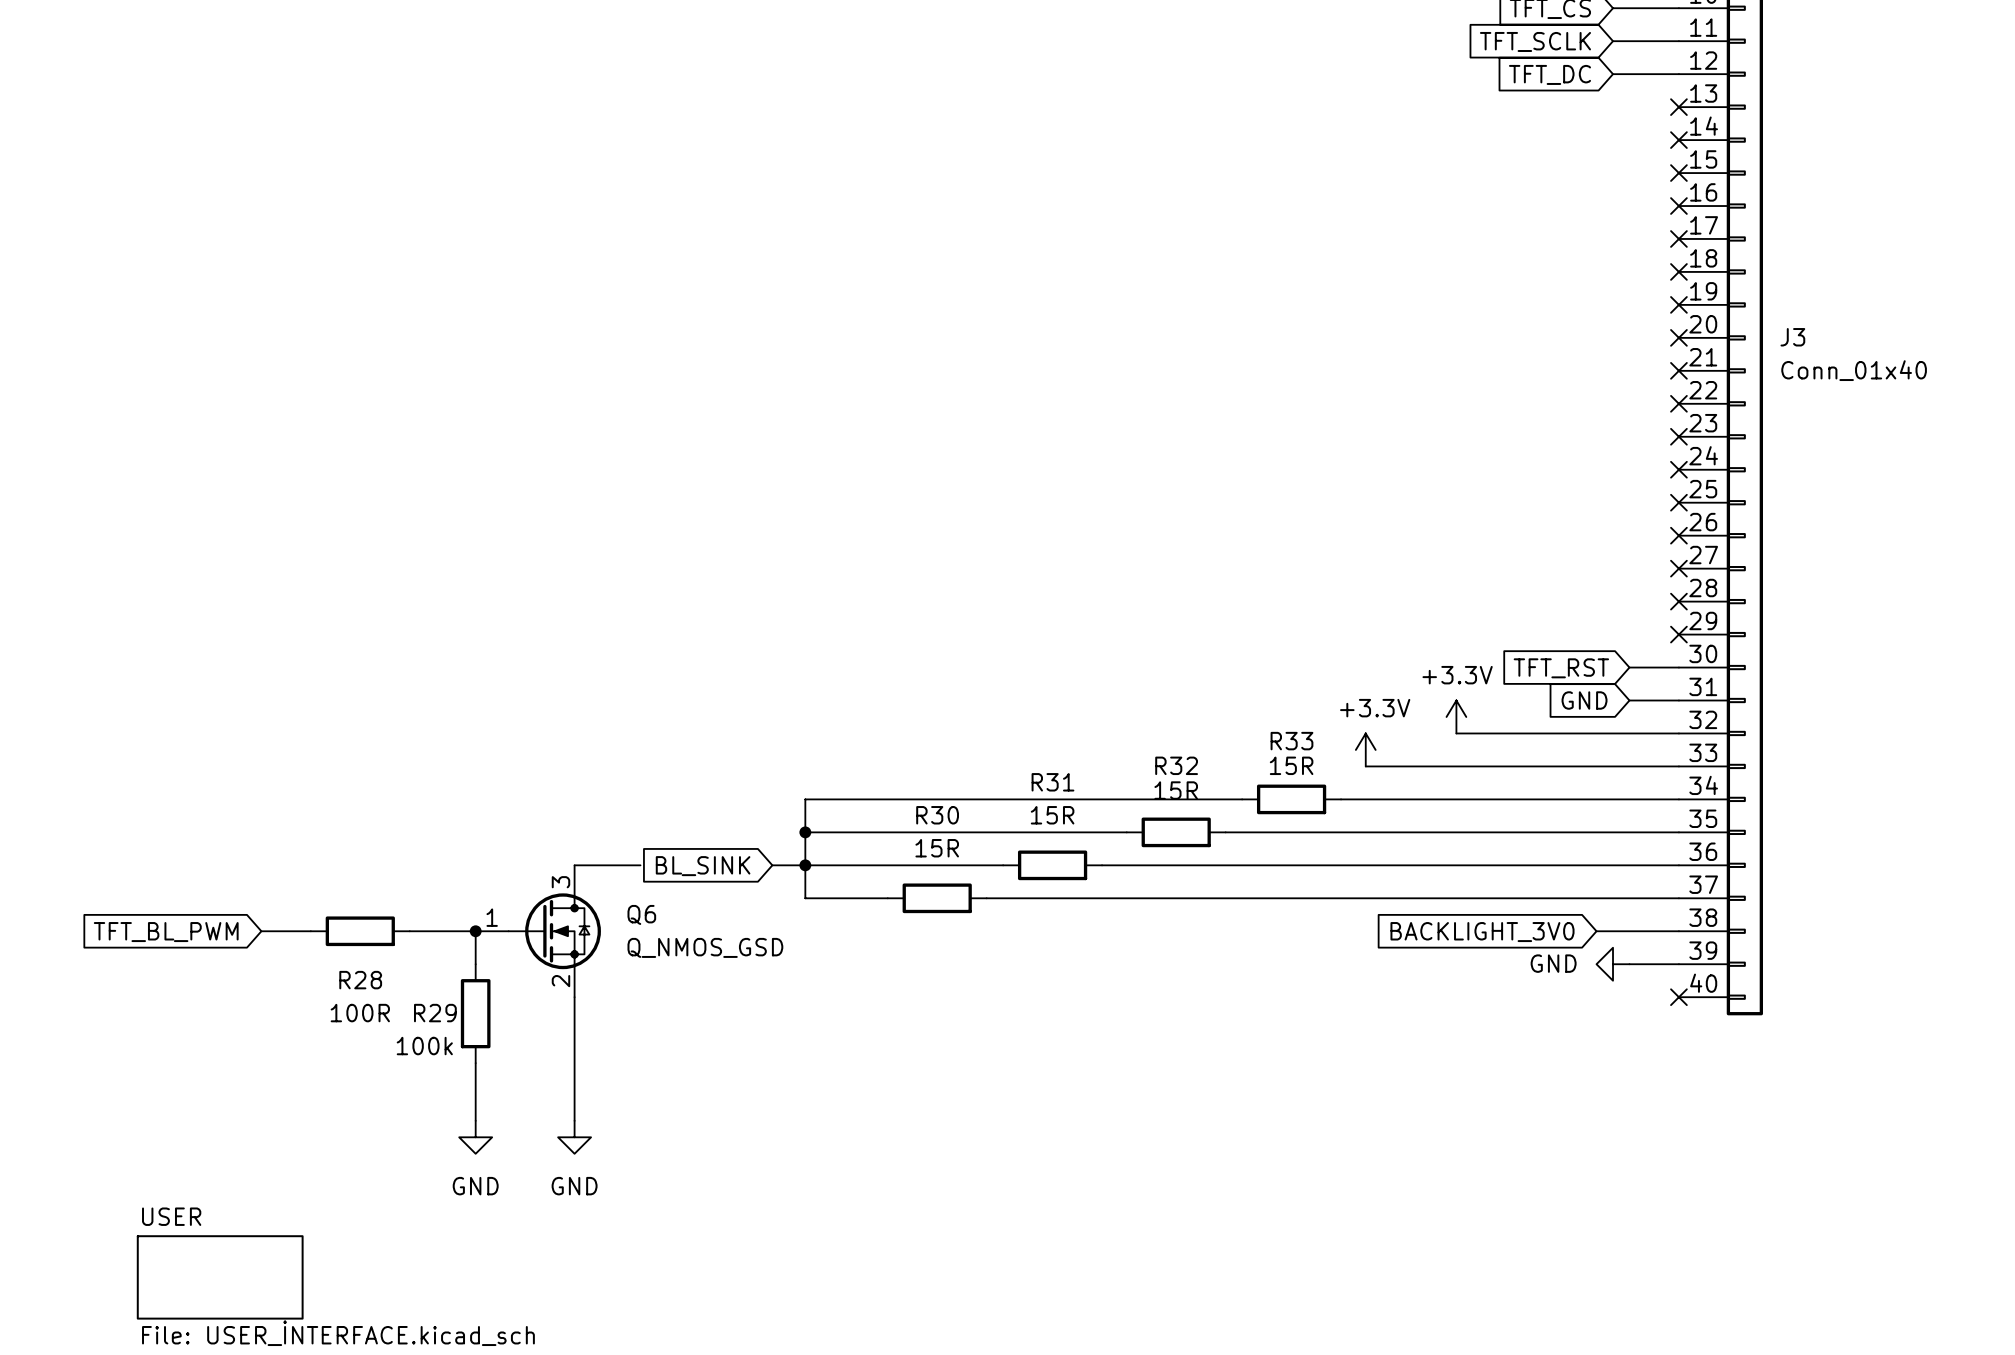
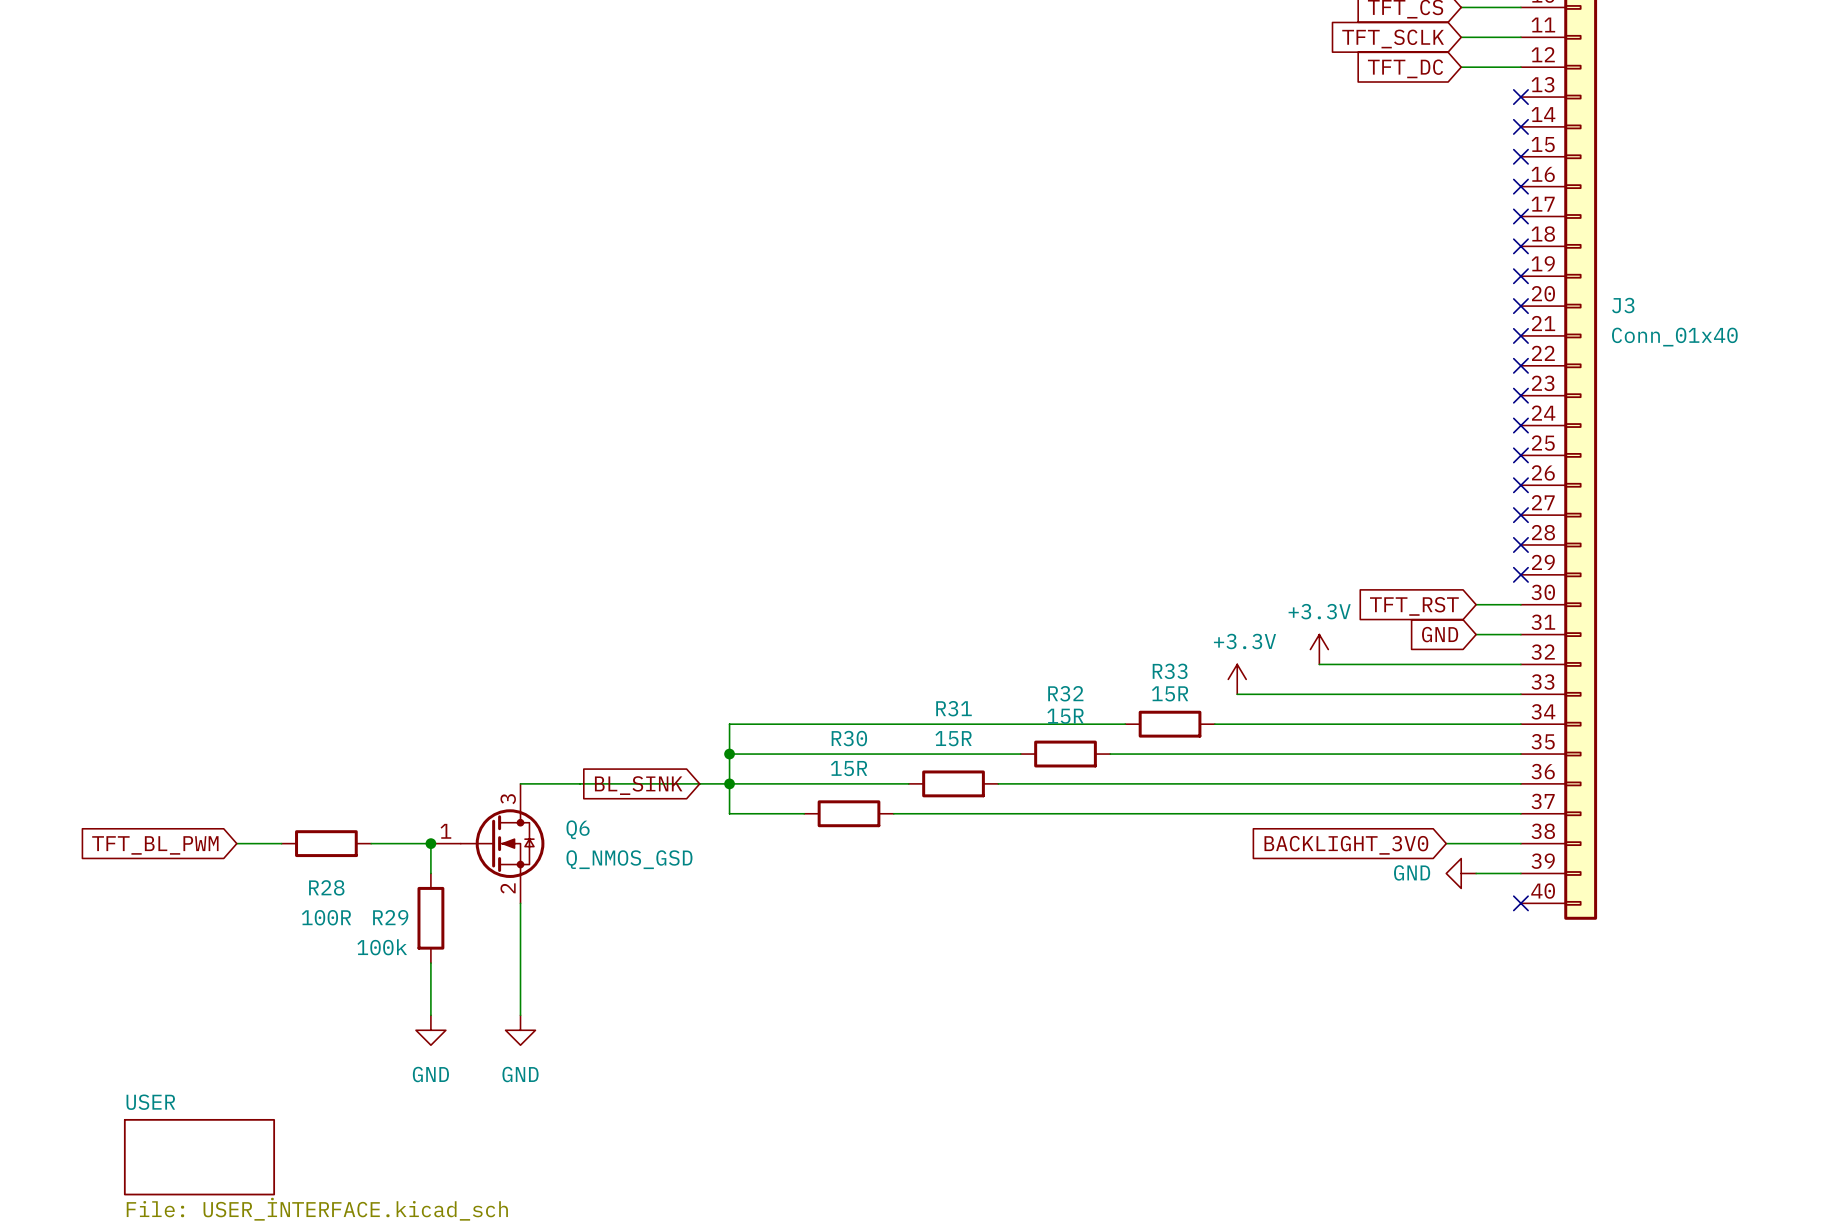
wire: none -> (580, 783) (699, 783)

